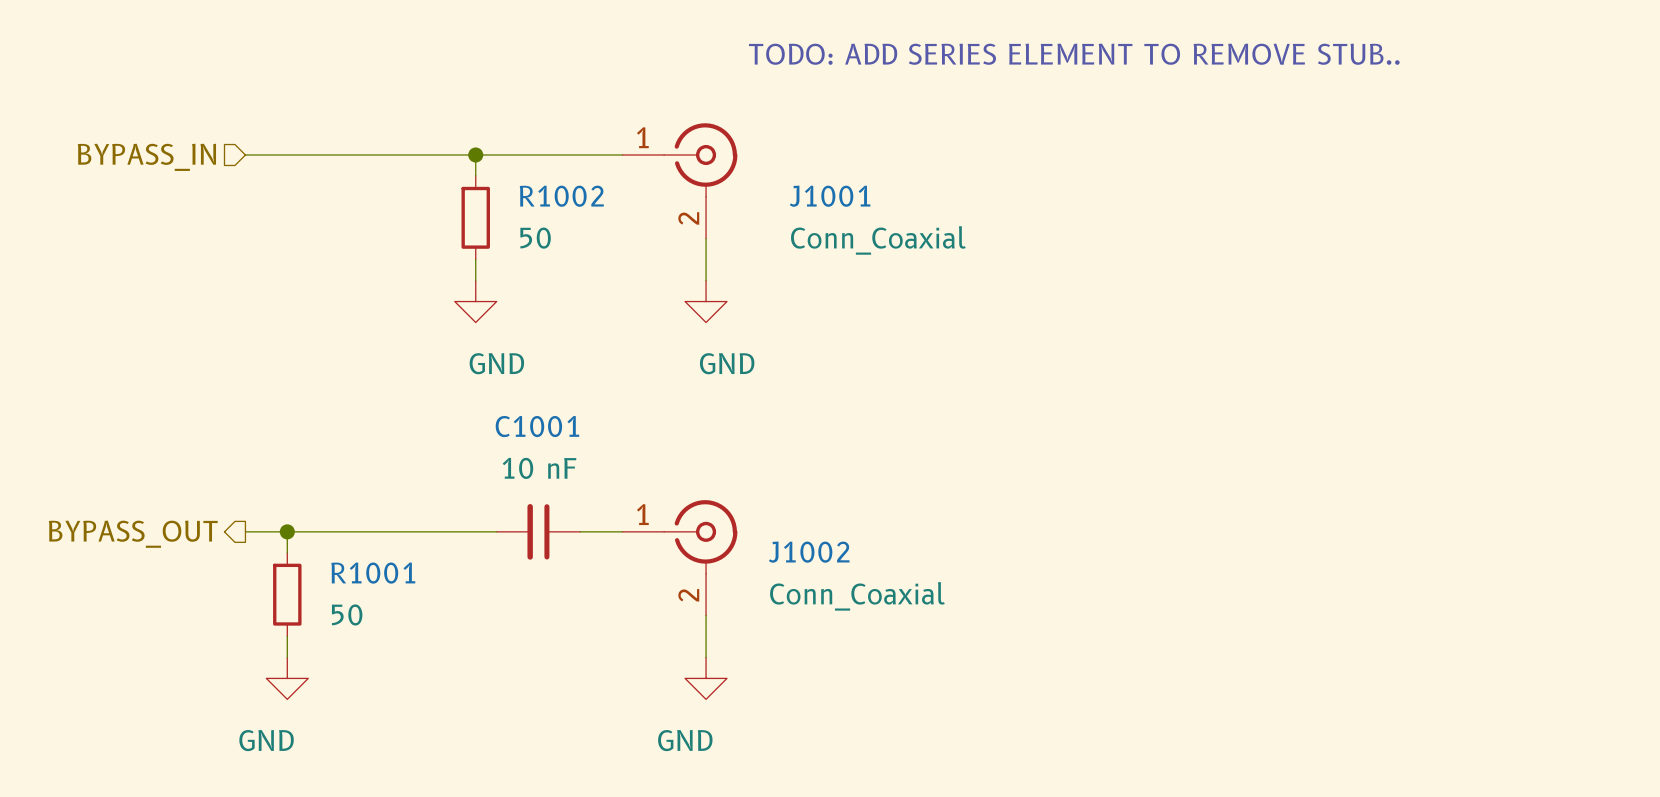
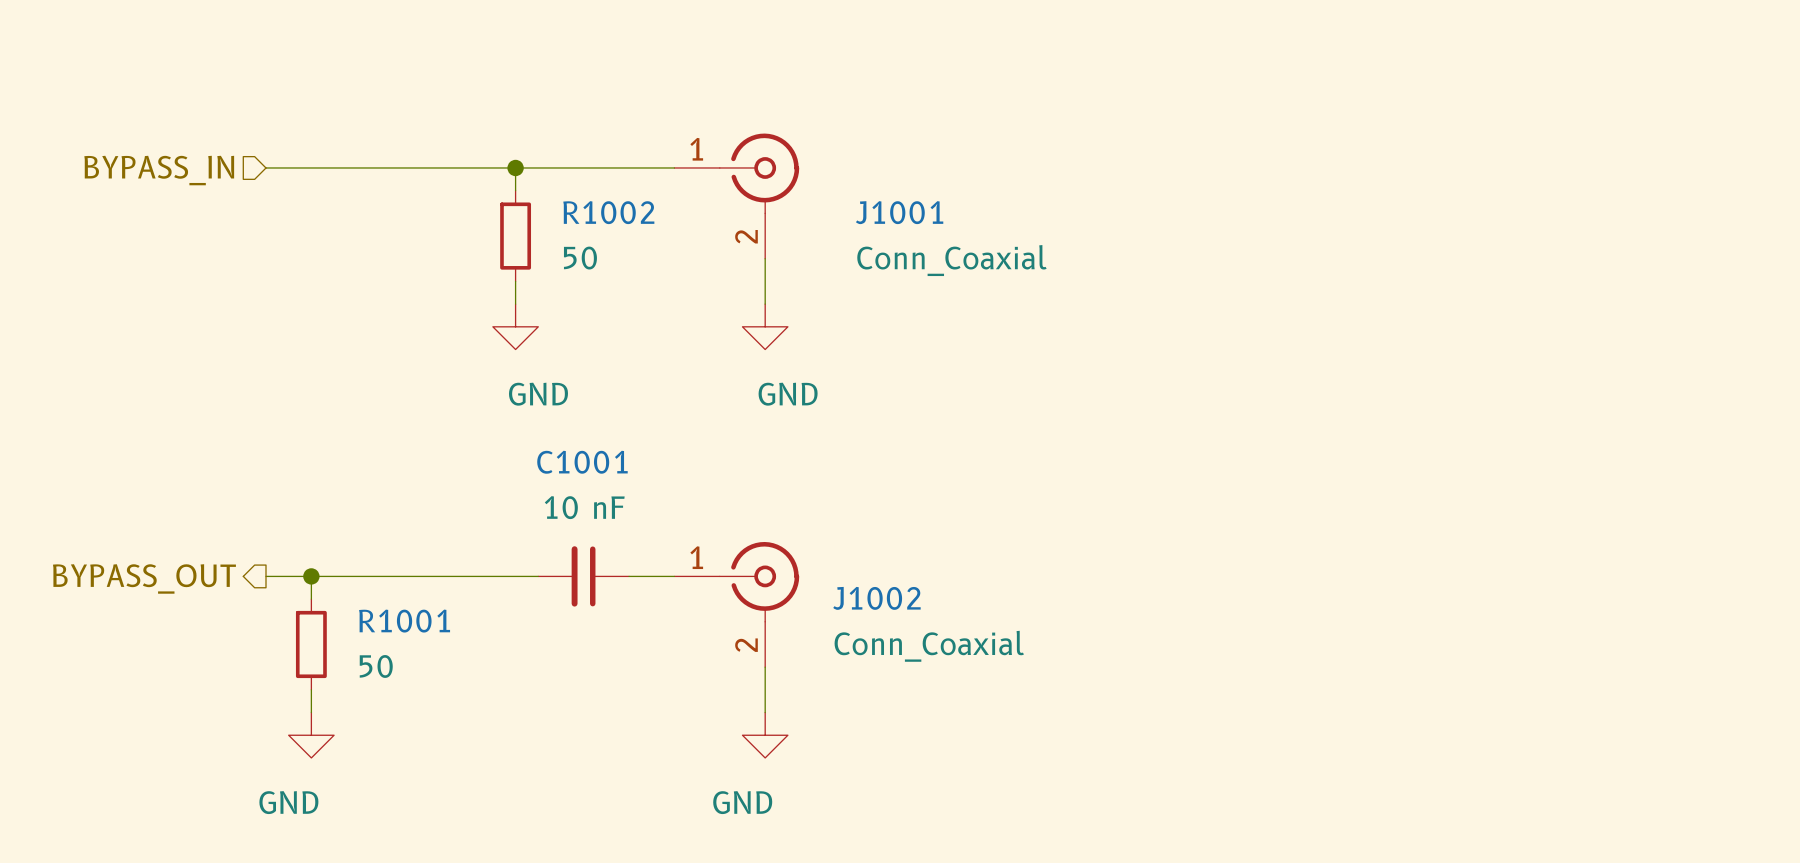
text: TODO: ADD SERIES ELEMENT TO REMOVE STUB.. (1074, 54) -> none

